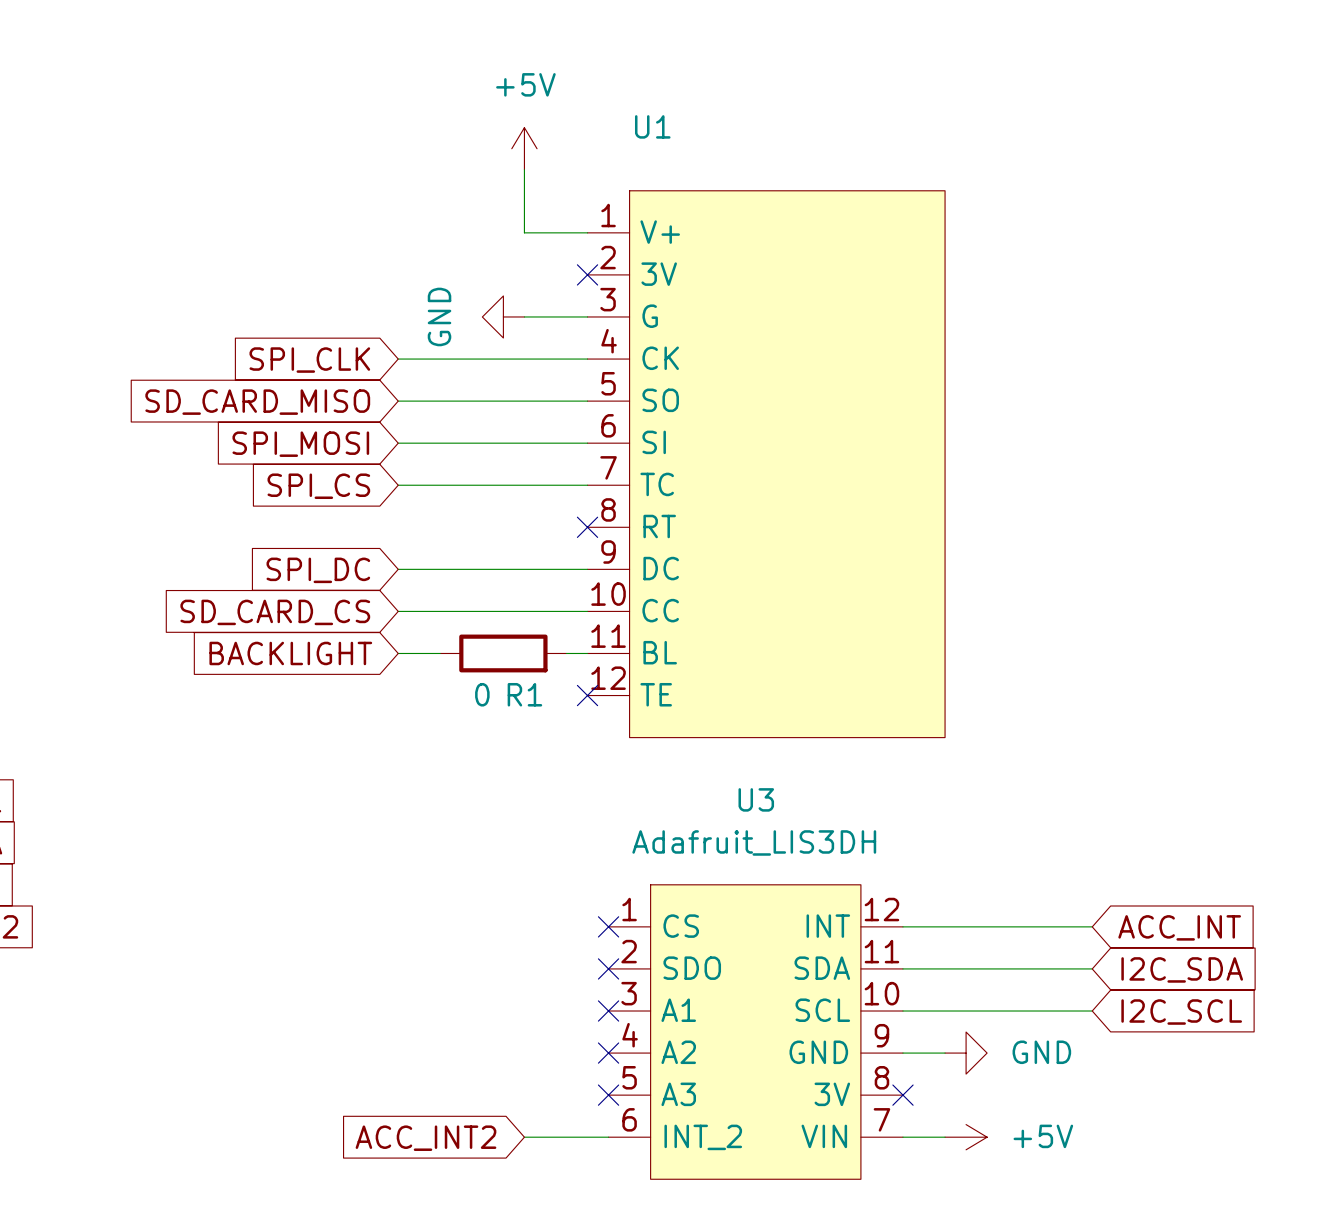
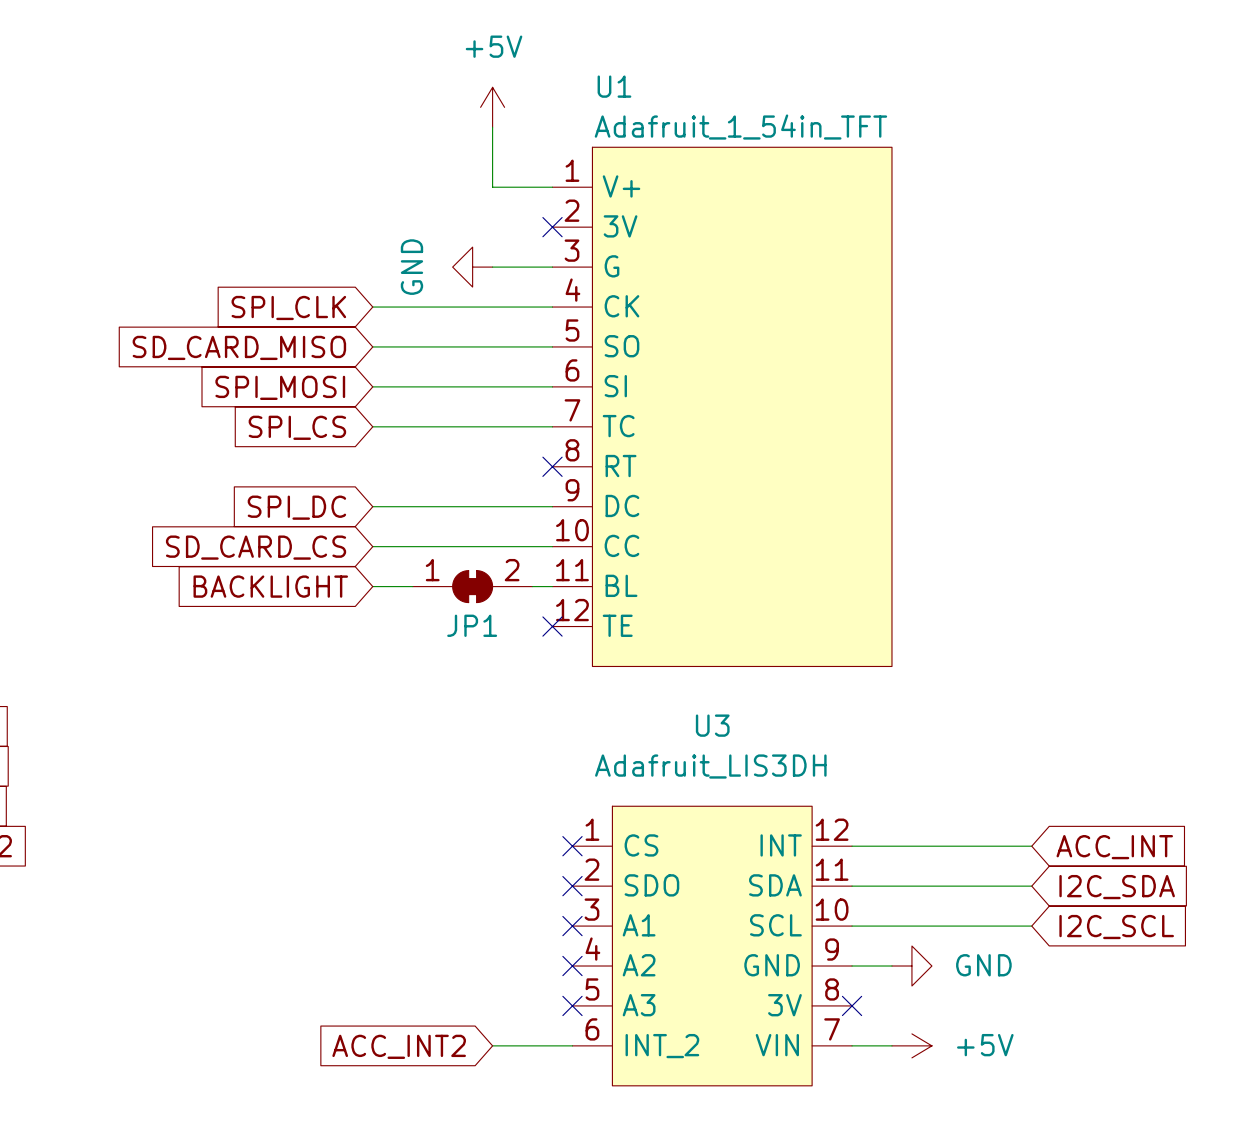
U1 value: none -> Adafruit_1_54in_TFT (740, 127)
R1: 0 (503, 653) -> none
JP1: none -> (472, 586)

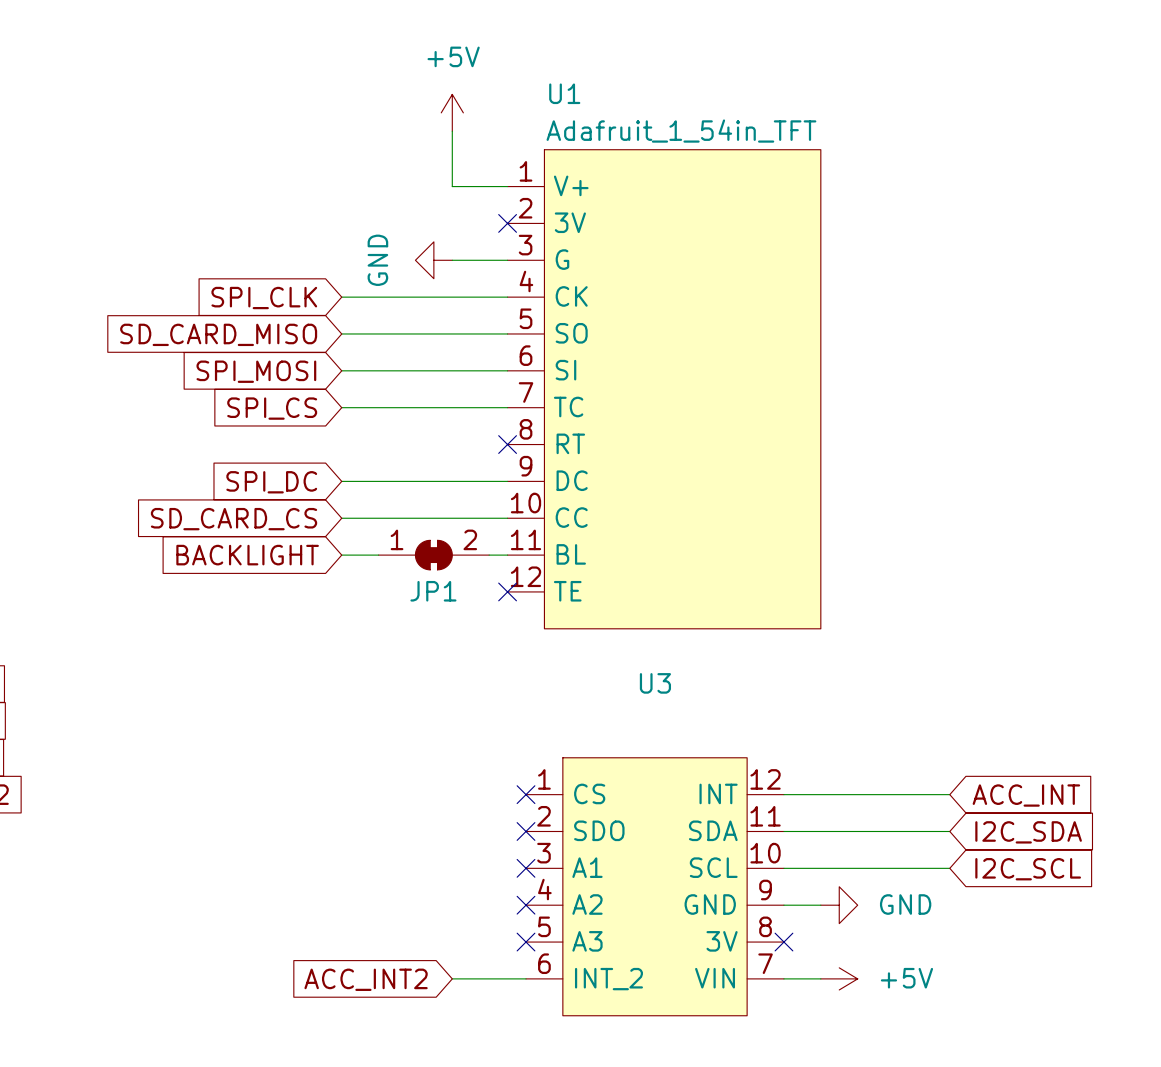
U3 value: Adafruit_LIS3DH (710, 766) -> none

